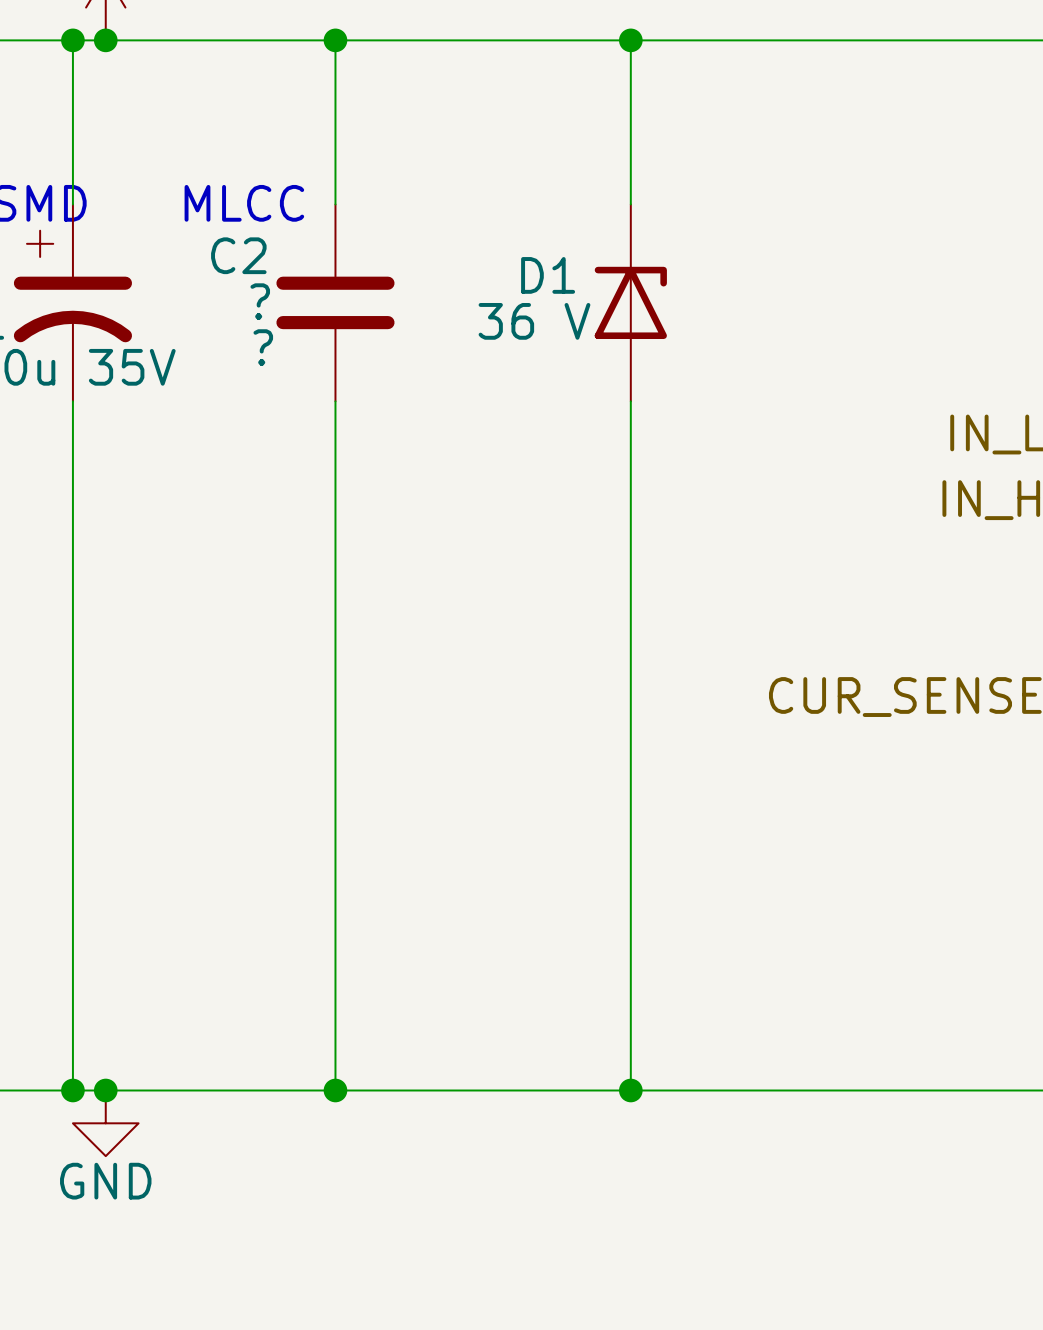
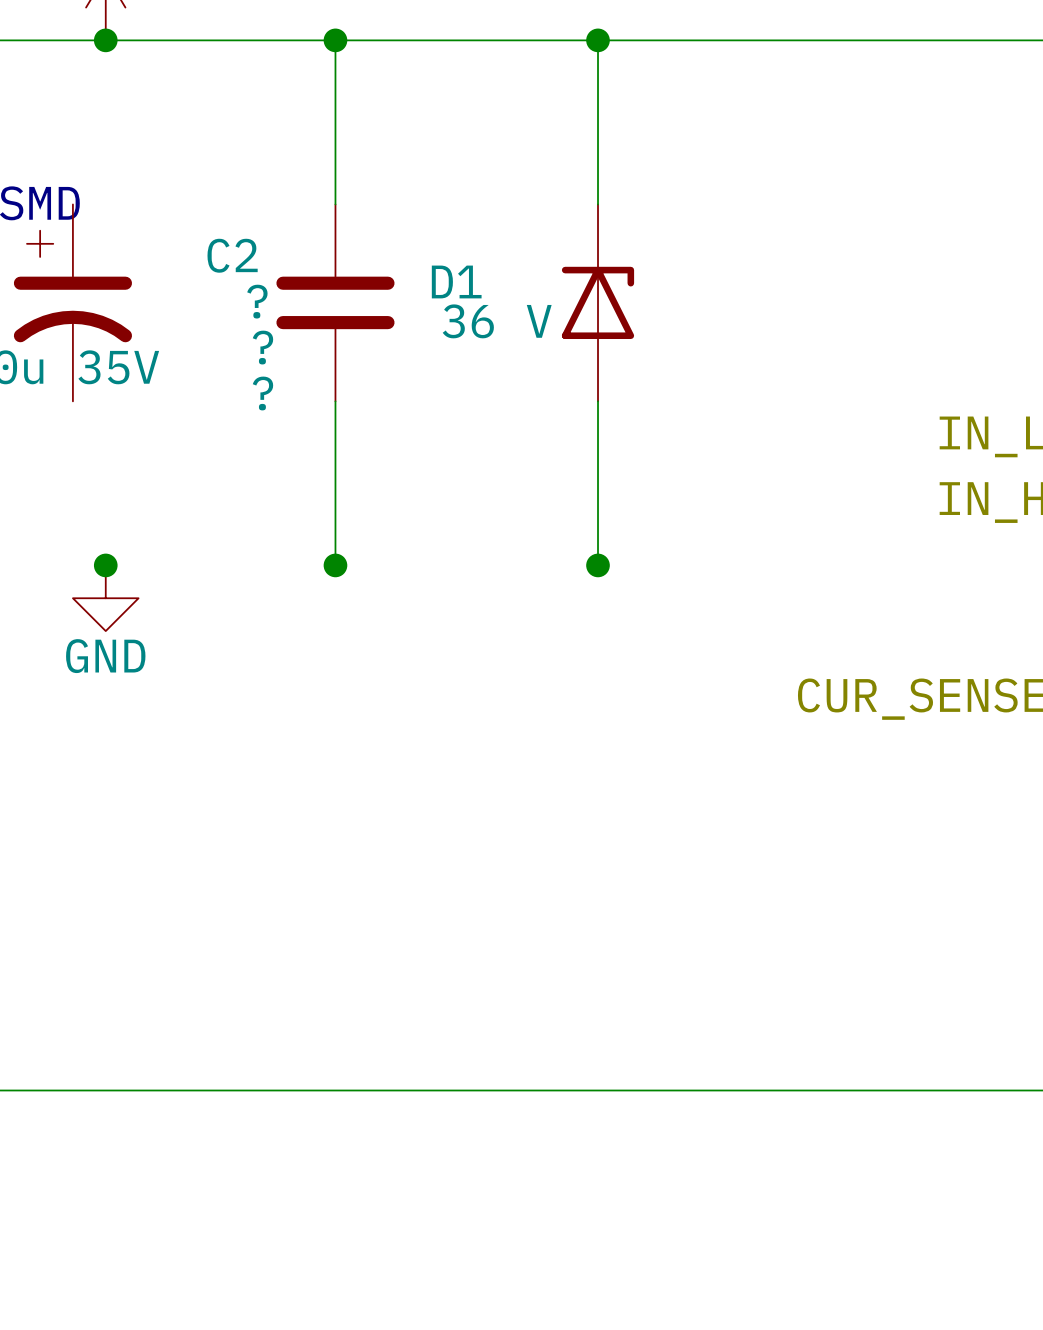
wire: (72, 40) (72, 204) -> (598, 401) (598, 565)
junction: (72, 40) -> none
wire: (630, 40) (630, 204) -> (598, 40) (598, 204)
junction position: (630, 40) -> (598, 40)
text: MLCC (244, 203) -> none
D1 name position: D1 (548, 275) -> D1 (456, 281)
D1 position: (630, 302) -> (598, 302)
C2 text: none -> ? (262, 393)
wire: (72, 401) (72, 1090) -> none
wire: (630, 401) (630, 1090) -> none
junction: none -> (105, 565)
wire: (335, 565) (335, 1090) -> none
junction: none -> (335, 565)
junction: none -> (598, 565)
junction: (72, 1090) -> none
junction: (105, 1090) -> none
junction: (335, 1090) -> none
junction: (630, 1090) -> none
power symbol position: GND (105, 1123) -> GND (105, 598)

